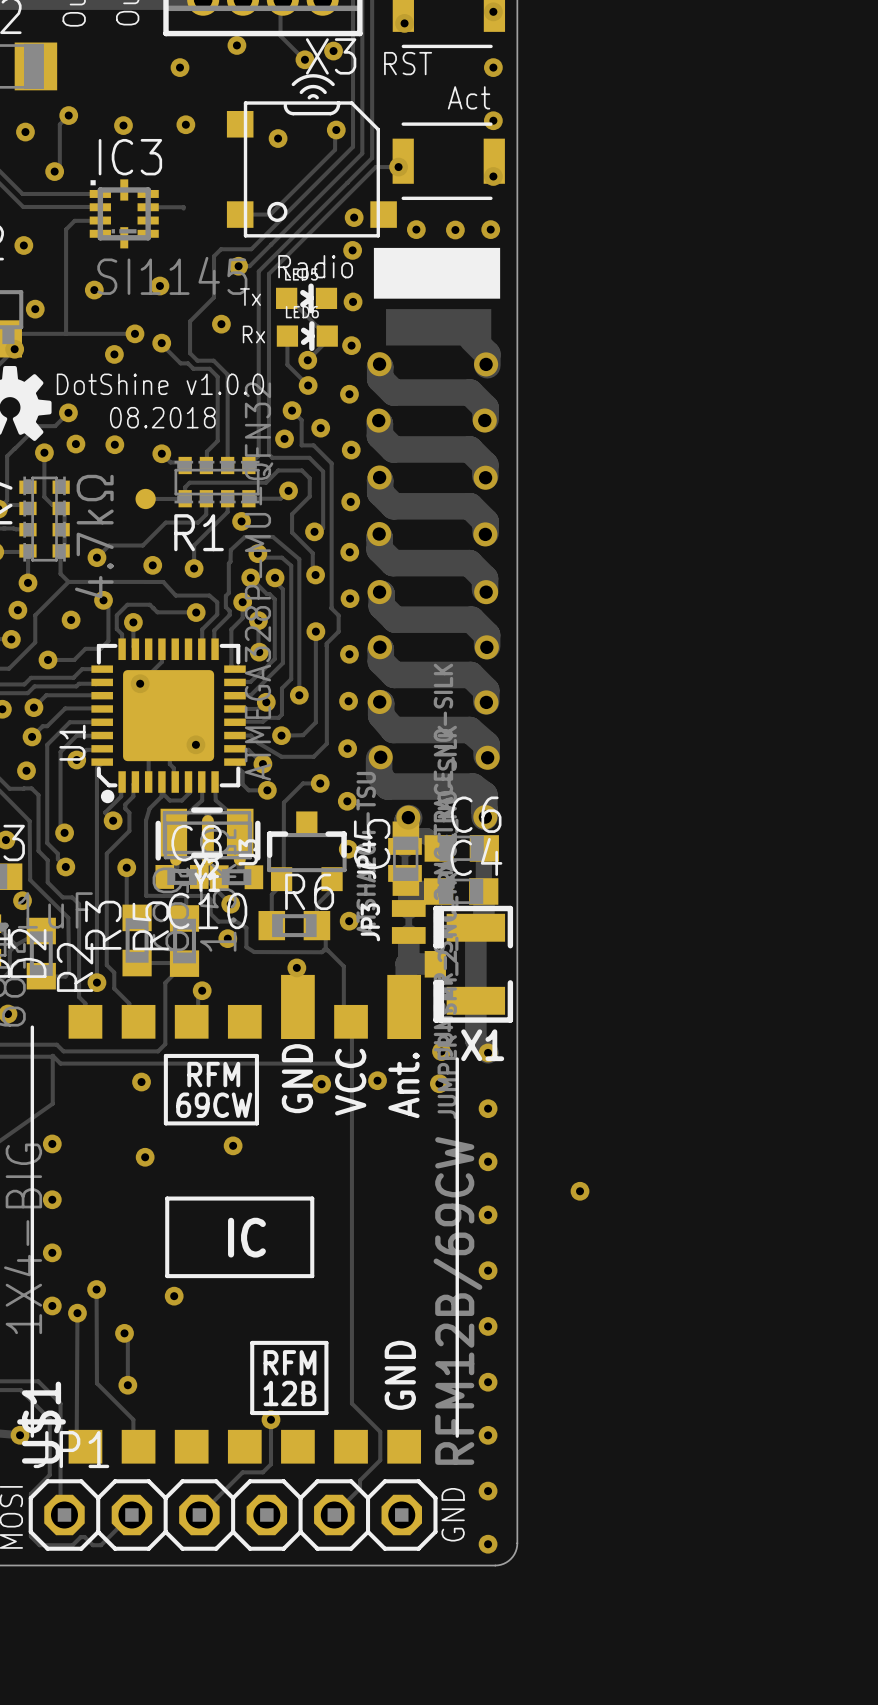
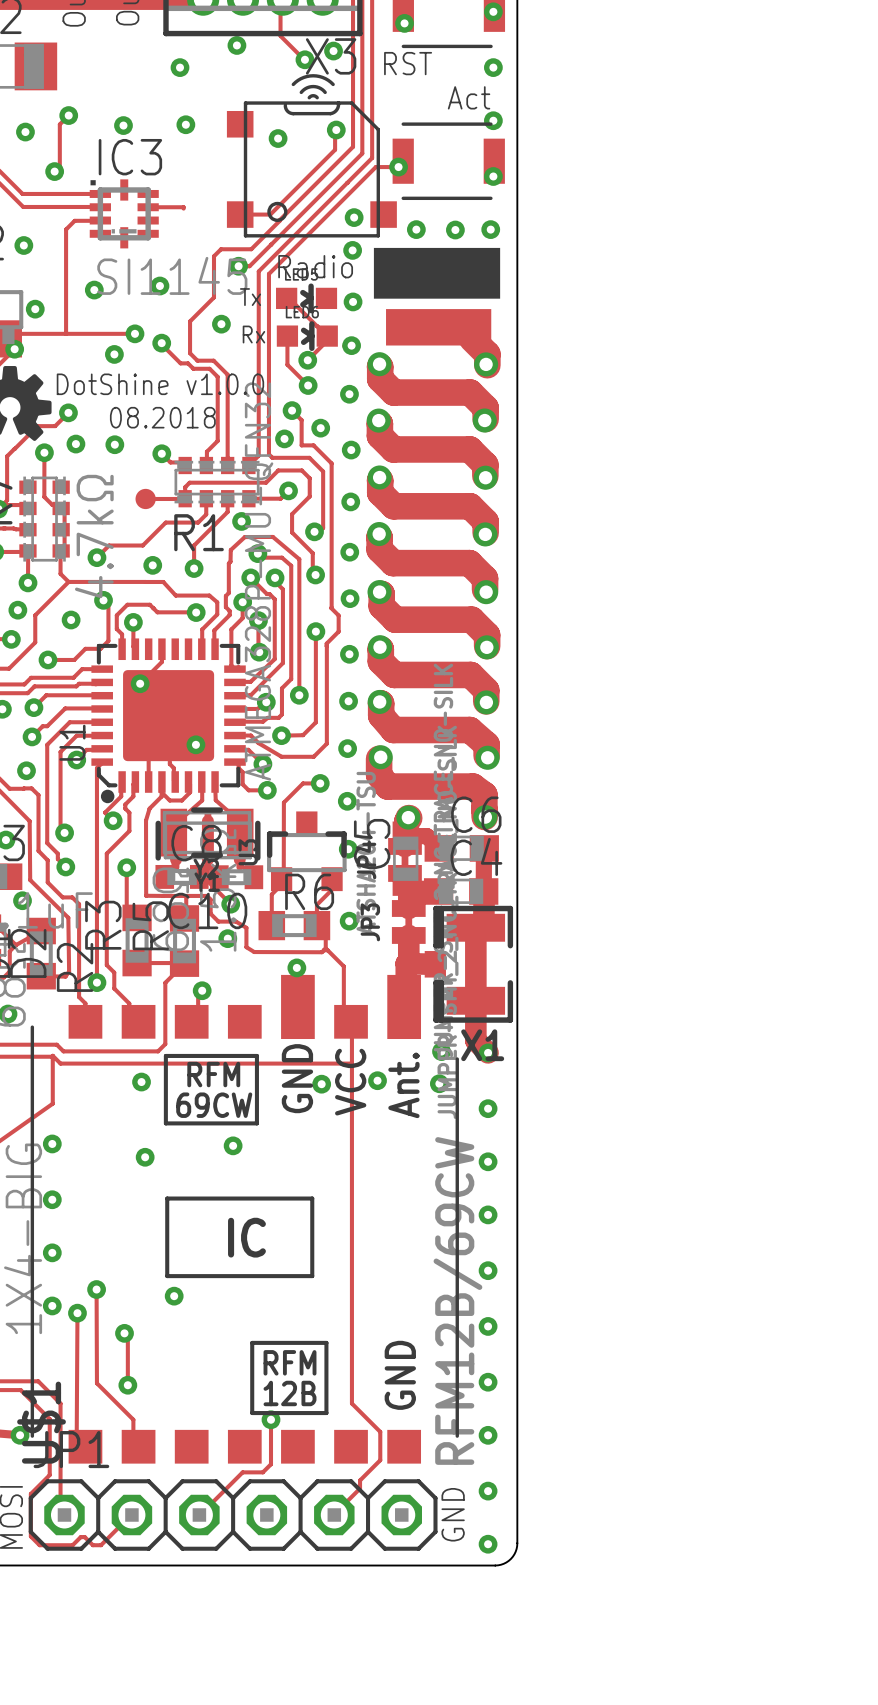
via: (580, 1191) -> none

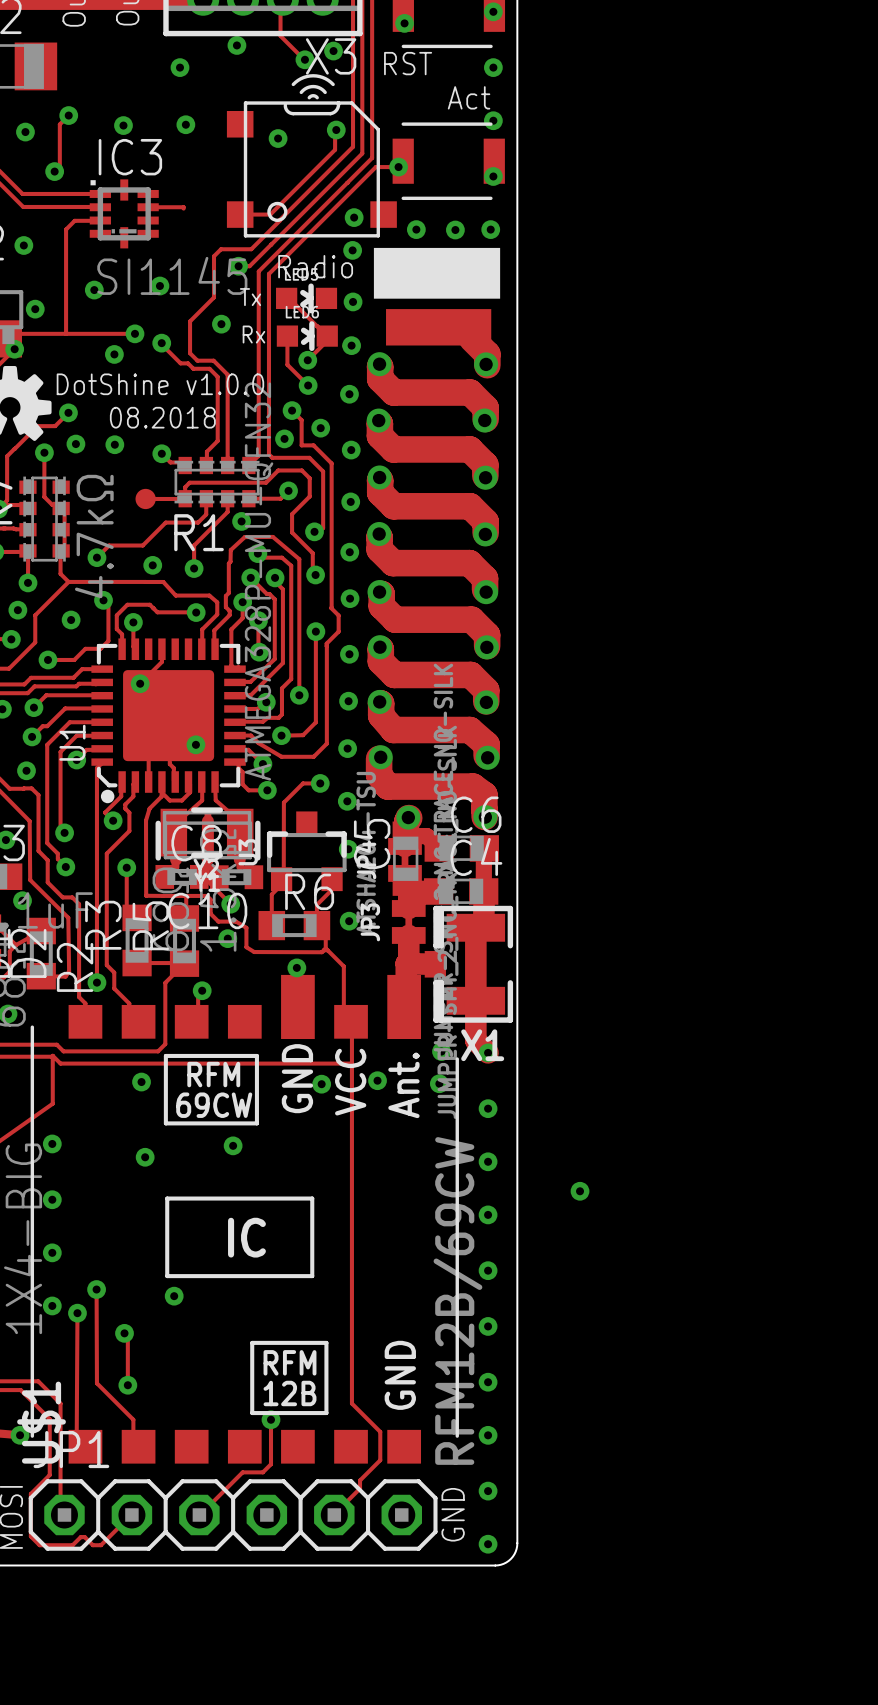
via: none -> (580, 1191)

